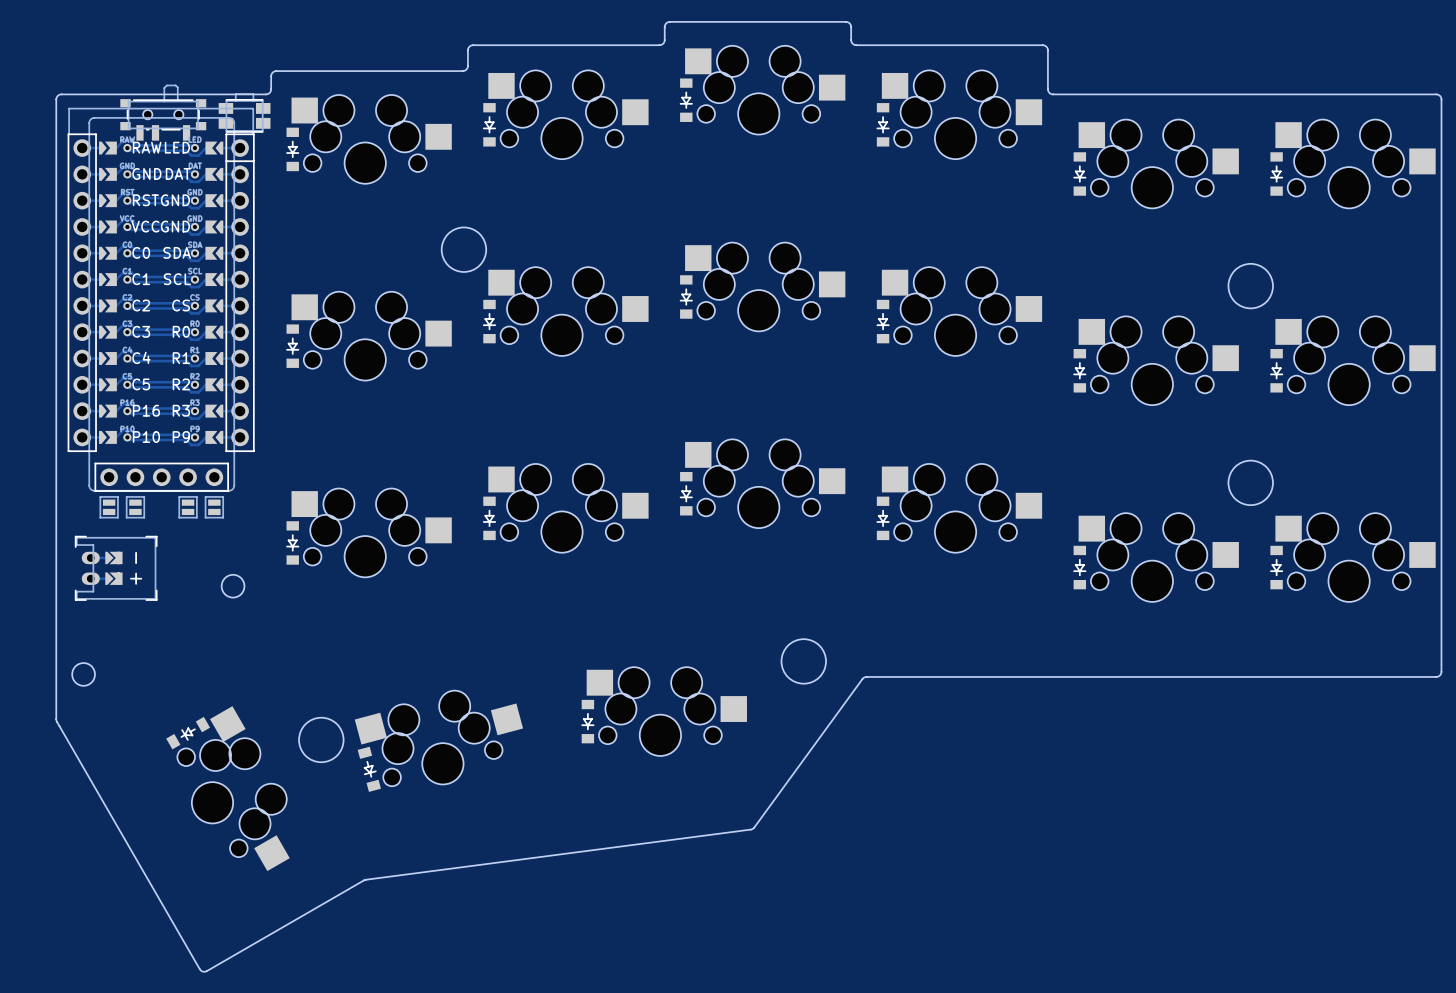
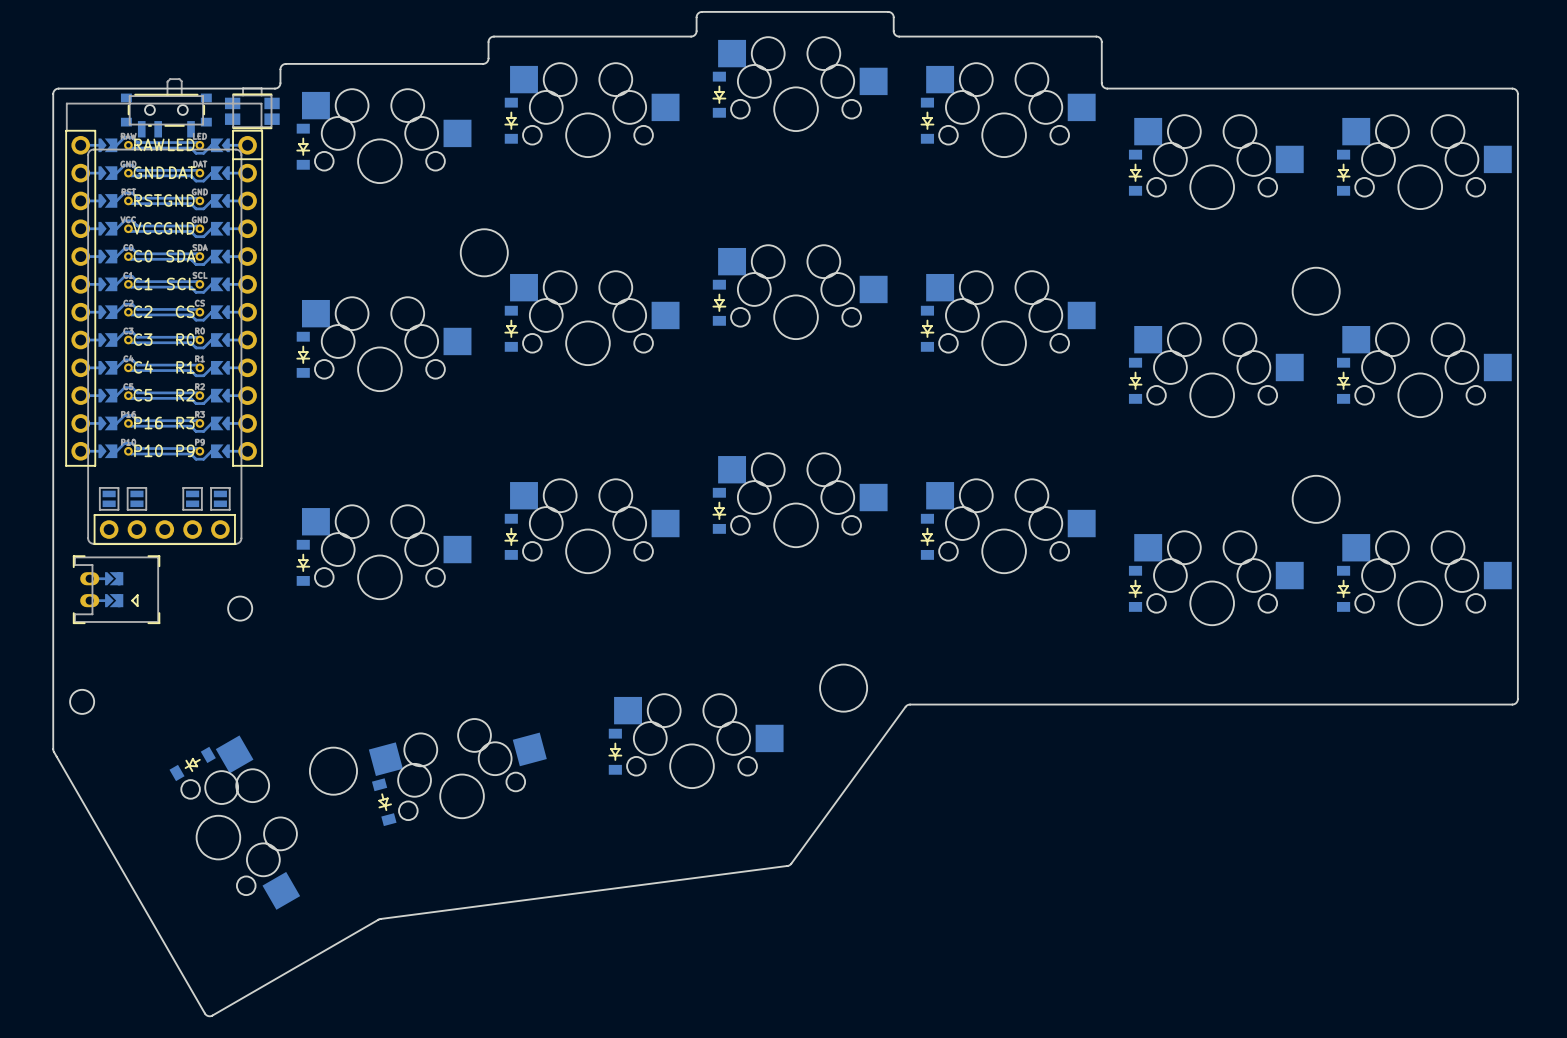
part: (161, 317) -> none
part: none -> (164, 346)
part footprint: [75, 536, 158, 601] -> [73, 555, 161, 624]

